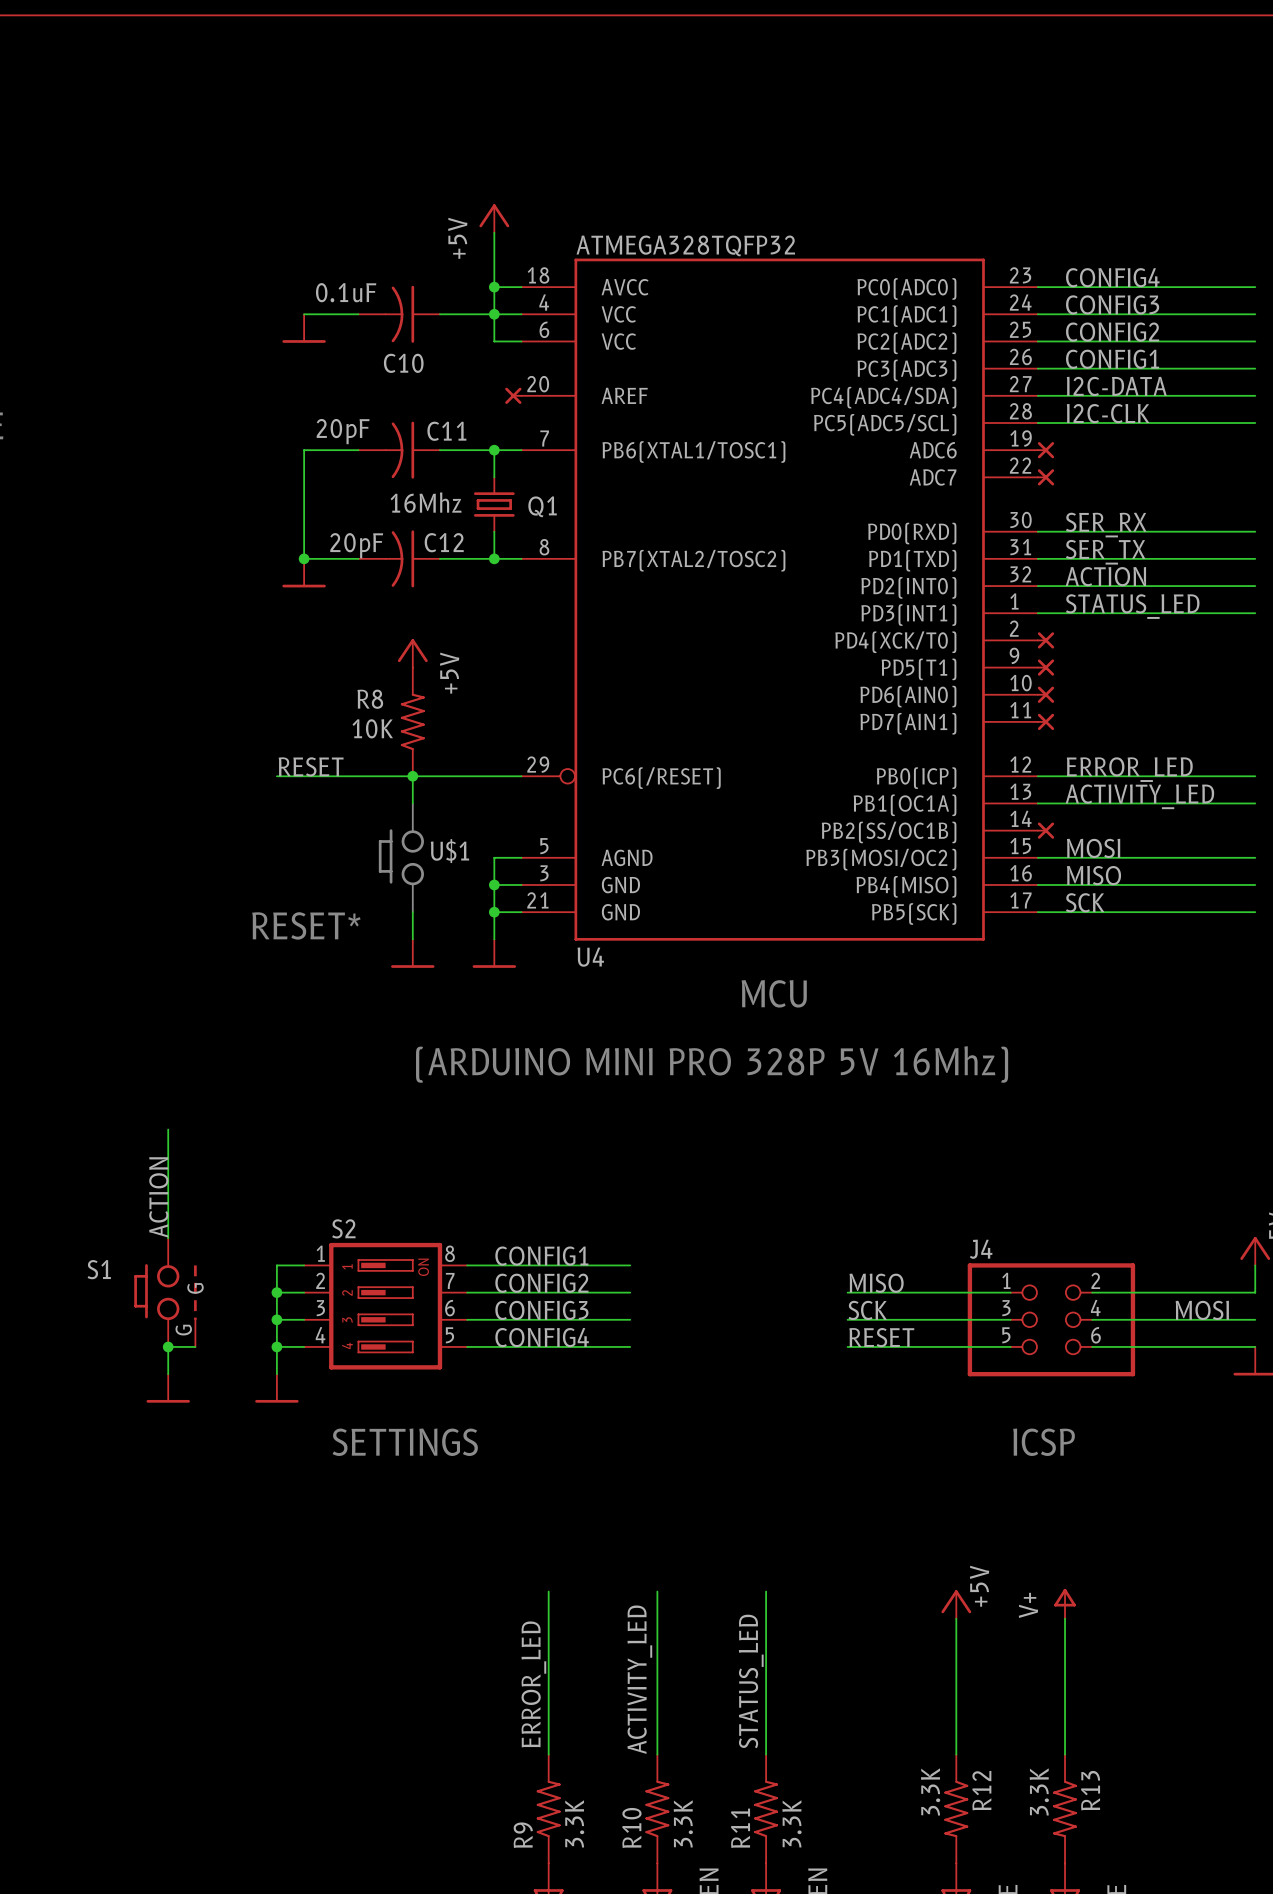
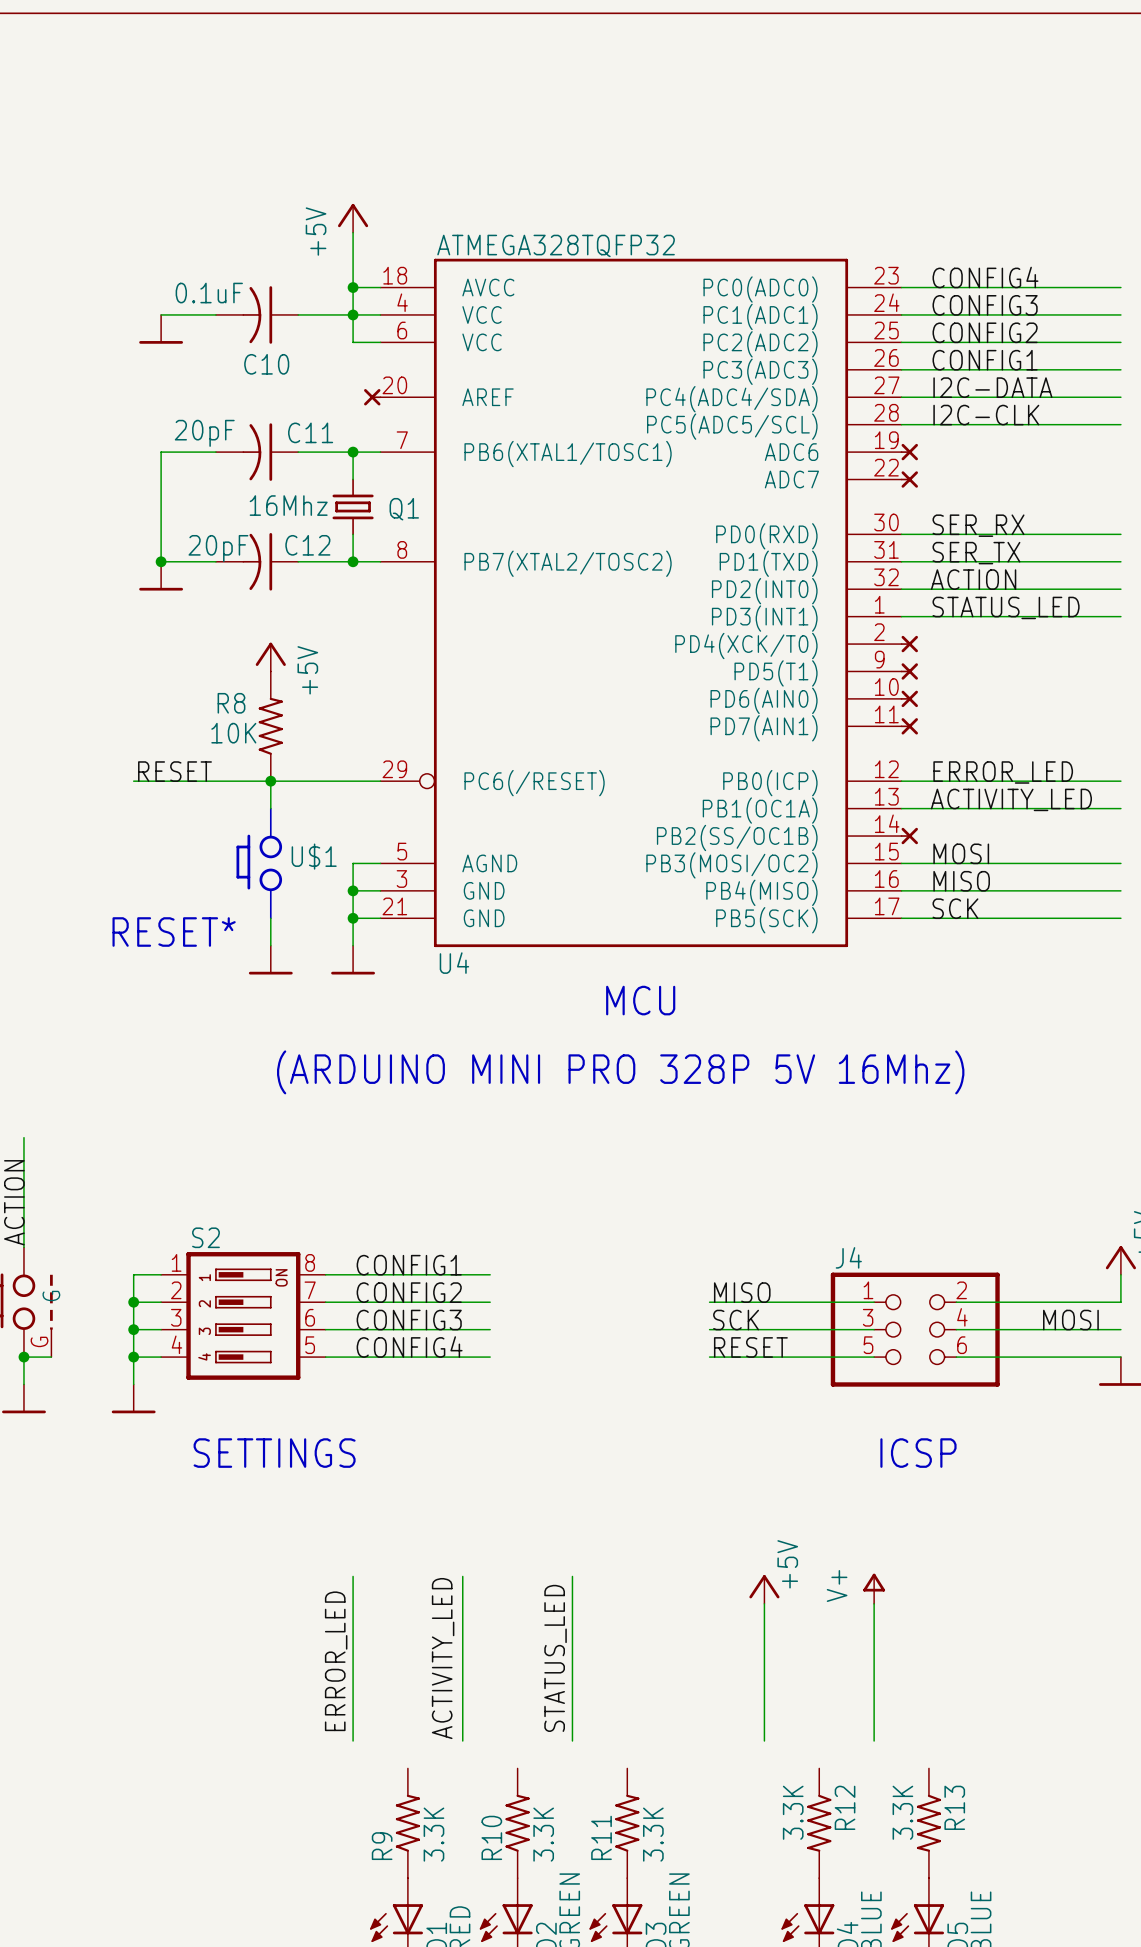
wire: (548, 1591) (548, 1754) -> (353, 1576) (353, 1741)
wire: (657, 1591) (657, 1754) -> (462, 1576) (462, 1741)
wire: (766, 1591) (766, 1754) -> (572, 1576) (572, 1741)
power symbol position: V+ (1065, 1603) -> V+ (874, 1588)
power symbol position: +5V (956, 1604) -> +5V (764, 1589)
wire: (956, 1618) (956, 1754) -> (764, 1603) (764, 1741)
wire: (1065, 1618) (1065, 1754) -> (874, 1603) (874, 1741)
label position: ACTIVITY_LED (639, 1679) -> ACTIVITY_LED (443, 1658)
label position: STATUS_LED (751, 1681) -> STATUS_LED (555, 1658)
label position: ERROR_LED (533, 1684) -> ERROR_LED (336, 1661)

